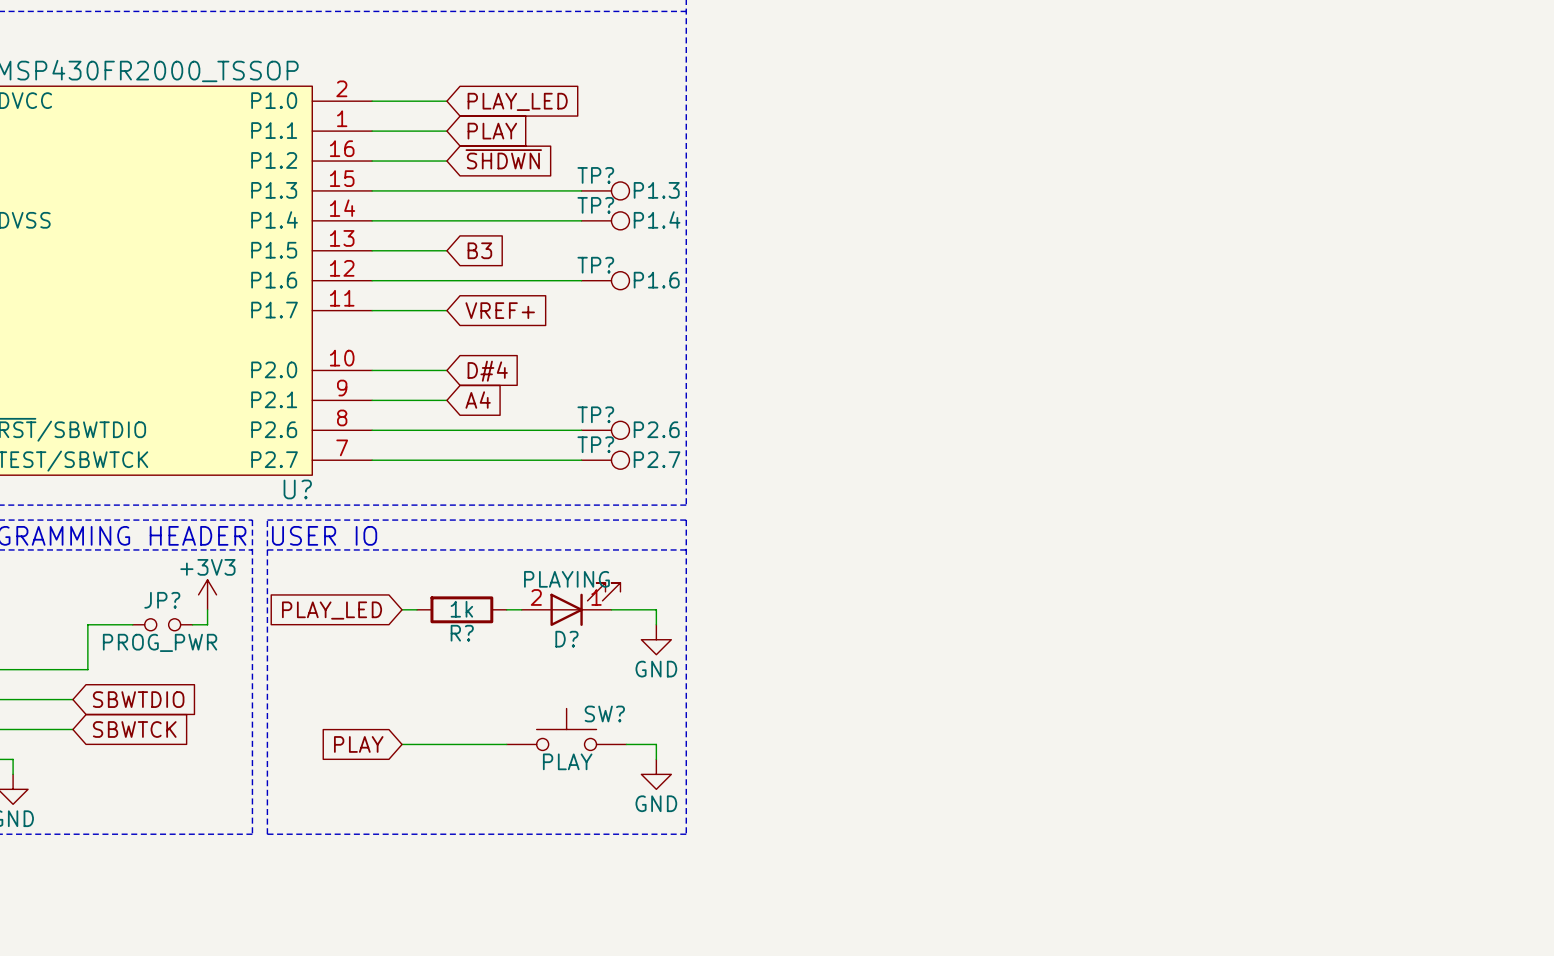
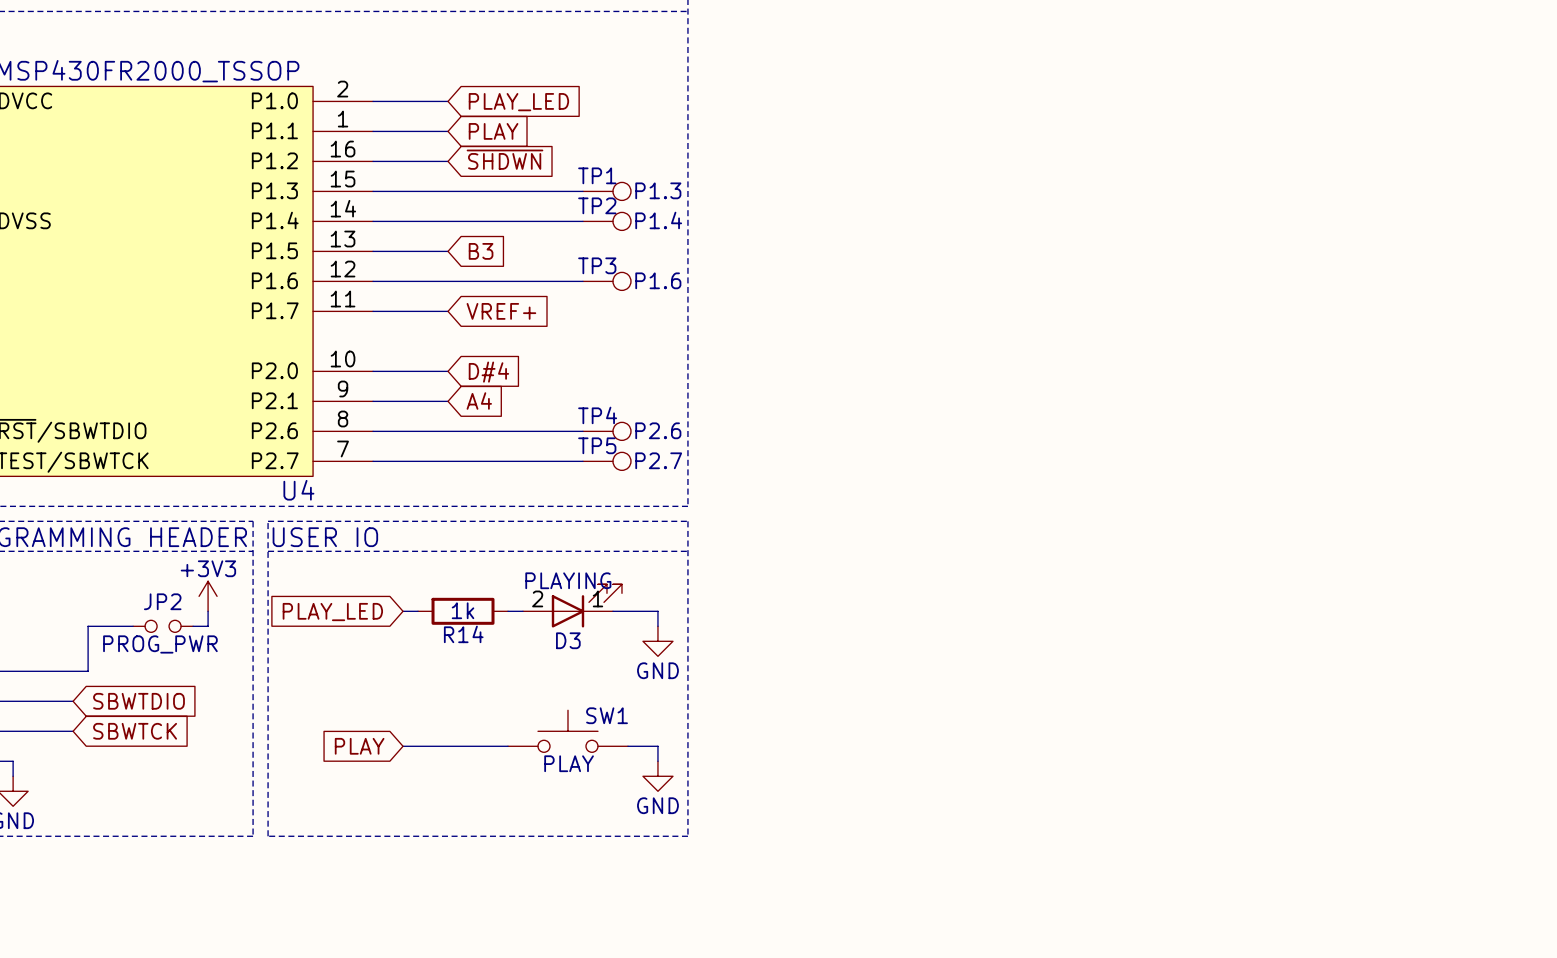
TP? name: TP? (595, 175) -> TP1 (597, 175)
TP? name: TP? (595, 205) -> TP2 (597, 205)
TP? name: TP? (595, 265) -> TP3 (597, 265)
TP? name: TP? (595, 414) -> TP4 (597, 415)
TP? name: TP? (595, 444) -> TP5 (597, 445)
U? name: U? (297, 489) -> U4 (298, 490)
JP? name: JP? (162, 600) -> JP2 (162, 601)
R? name: R? (462, 633) -> R14 (463, 634)
D? name: D? (566, 639) -> D3 (568, 640)
SW? name: SW? (604, 713) -> SW1 (607, 715)

